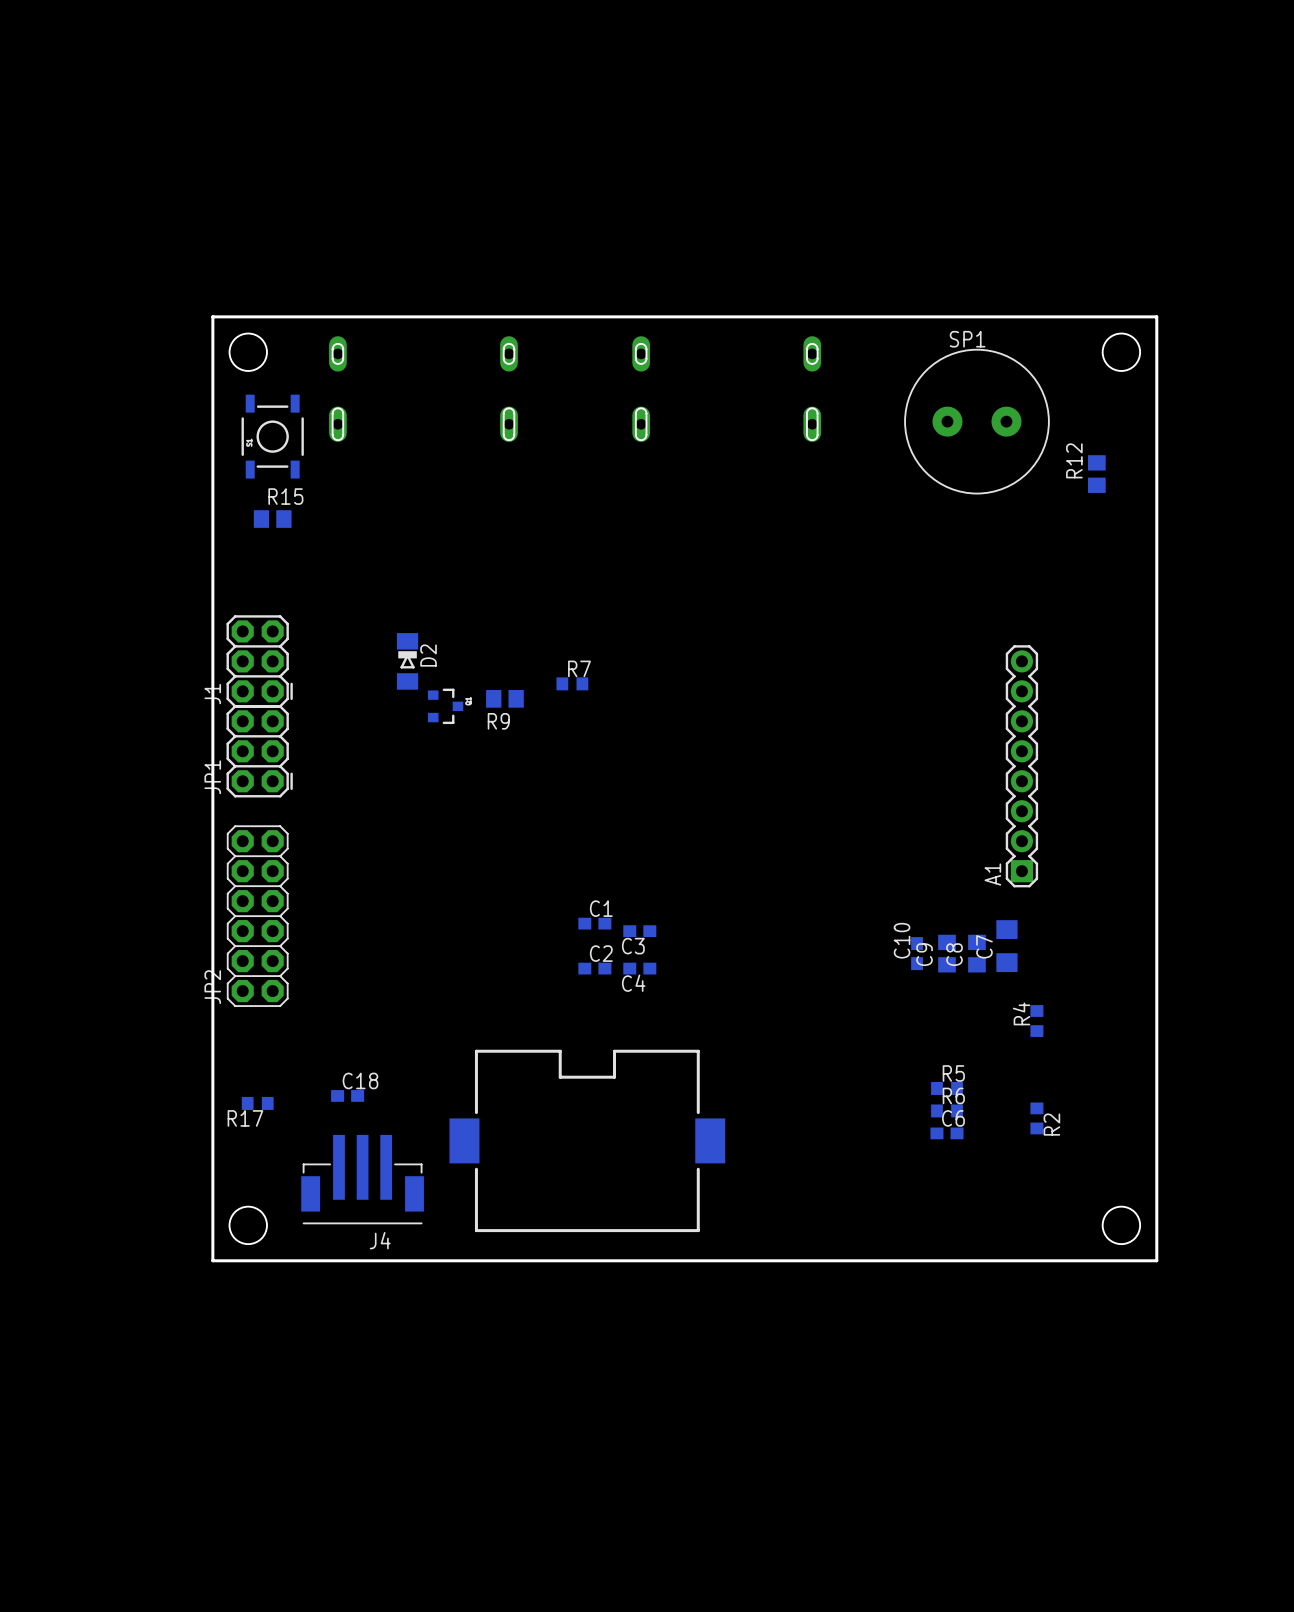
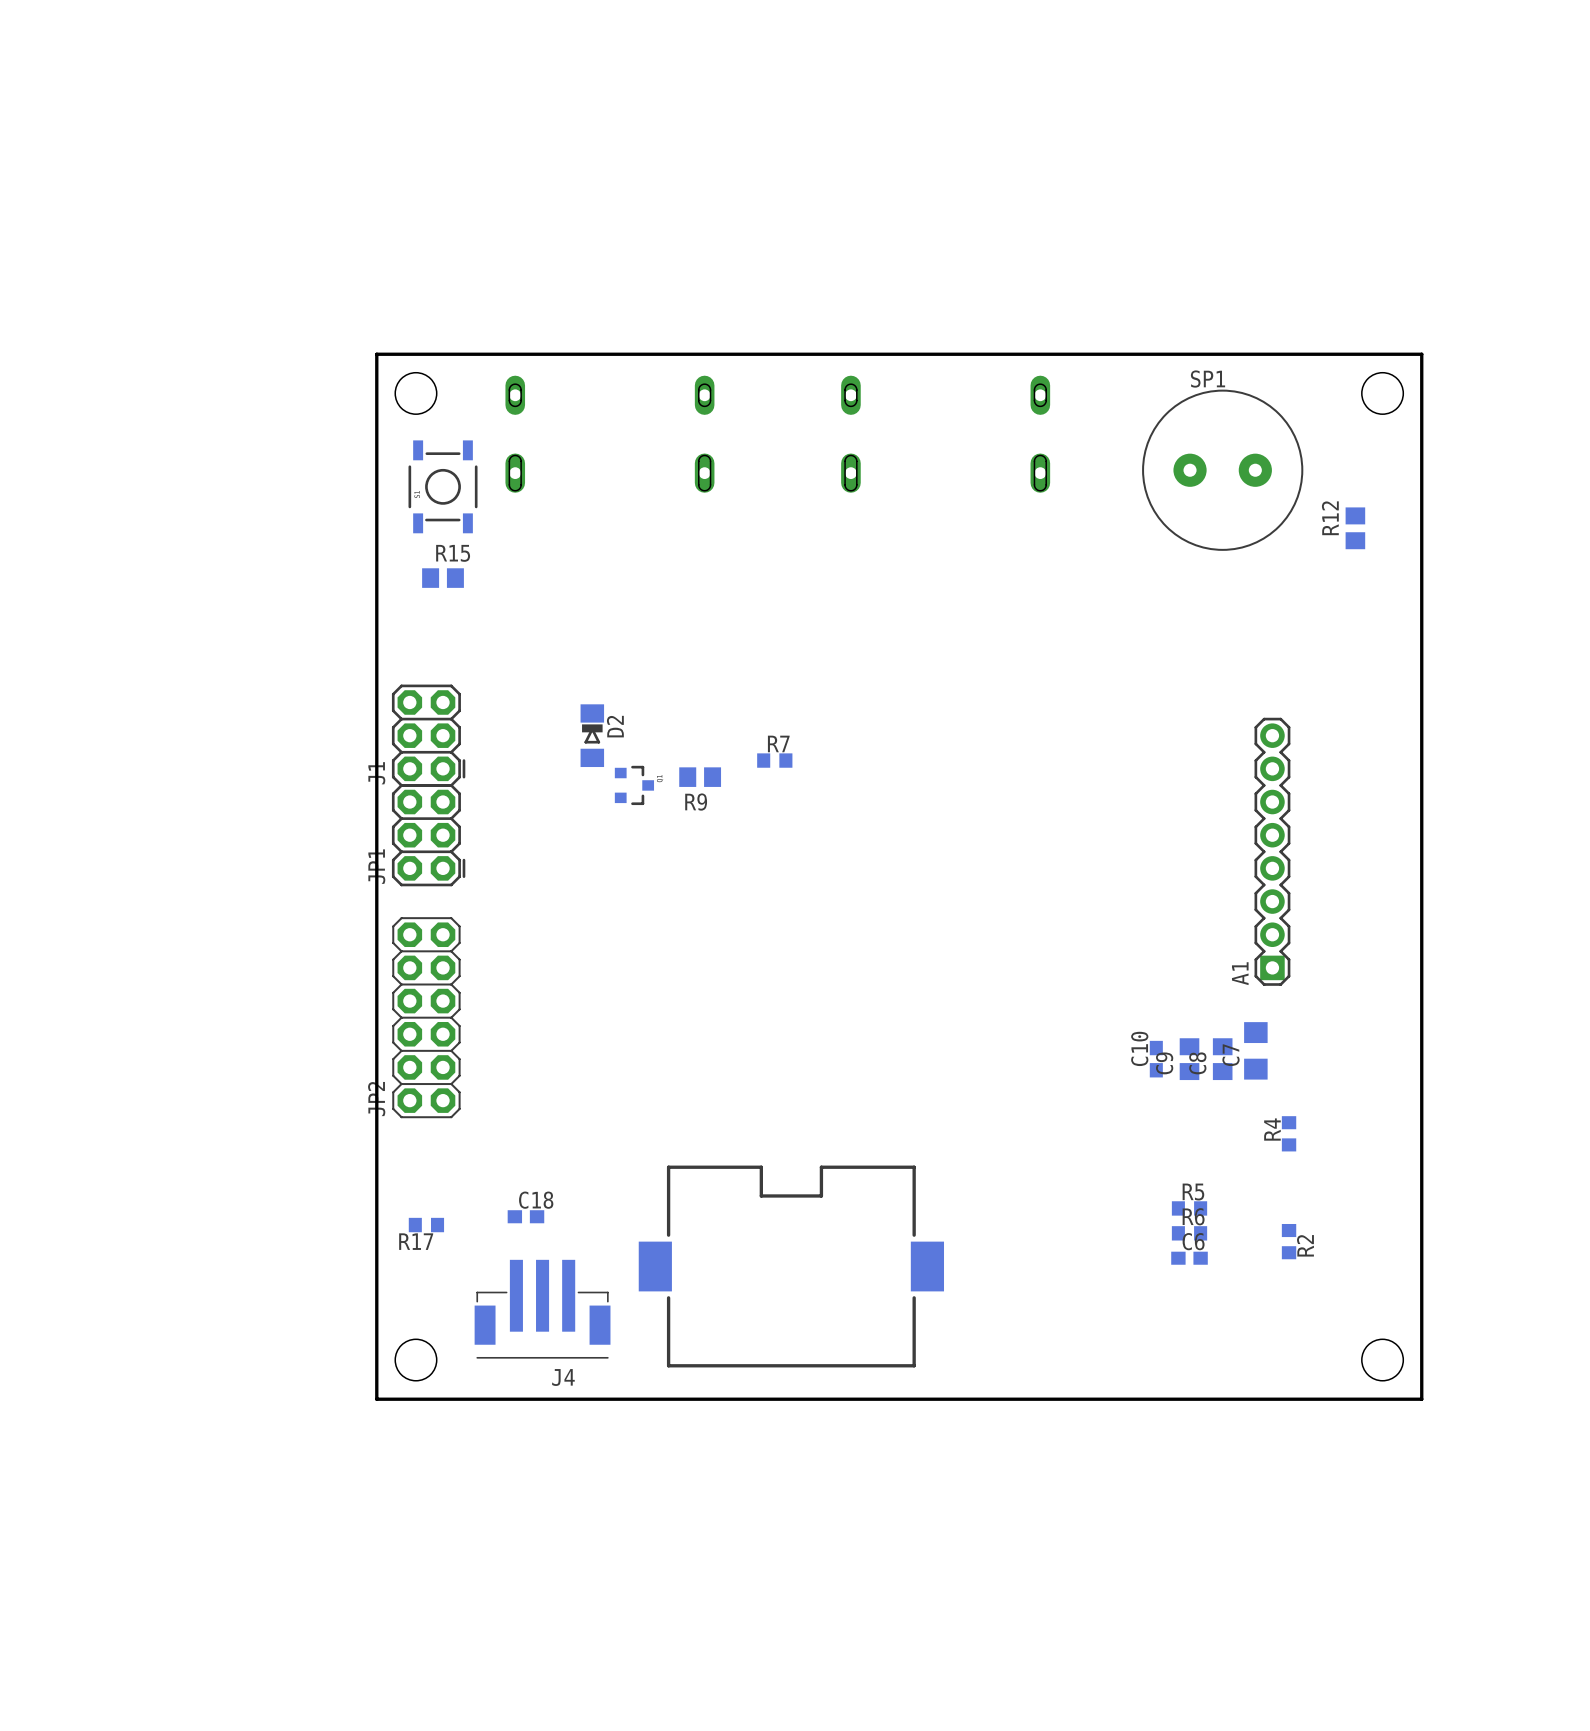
C1: (594, 923) -> none
C3: (639, 931) -> none
C2: (594, 968) -> none
C4: (639, 968) -> none

